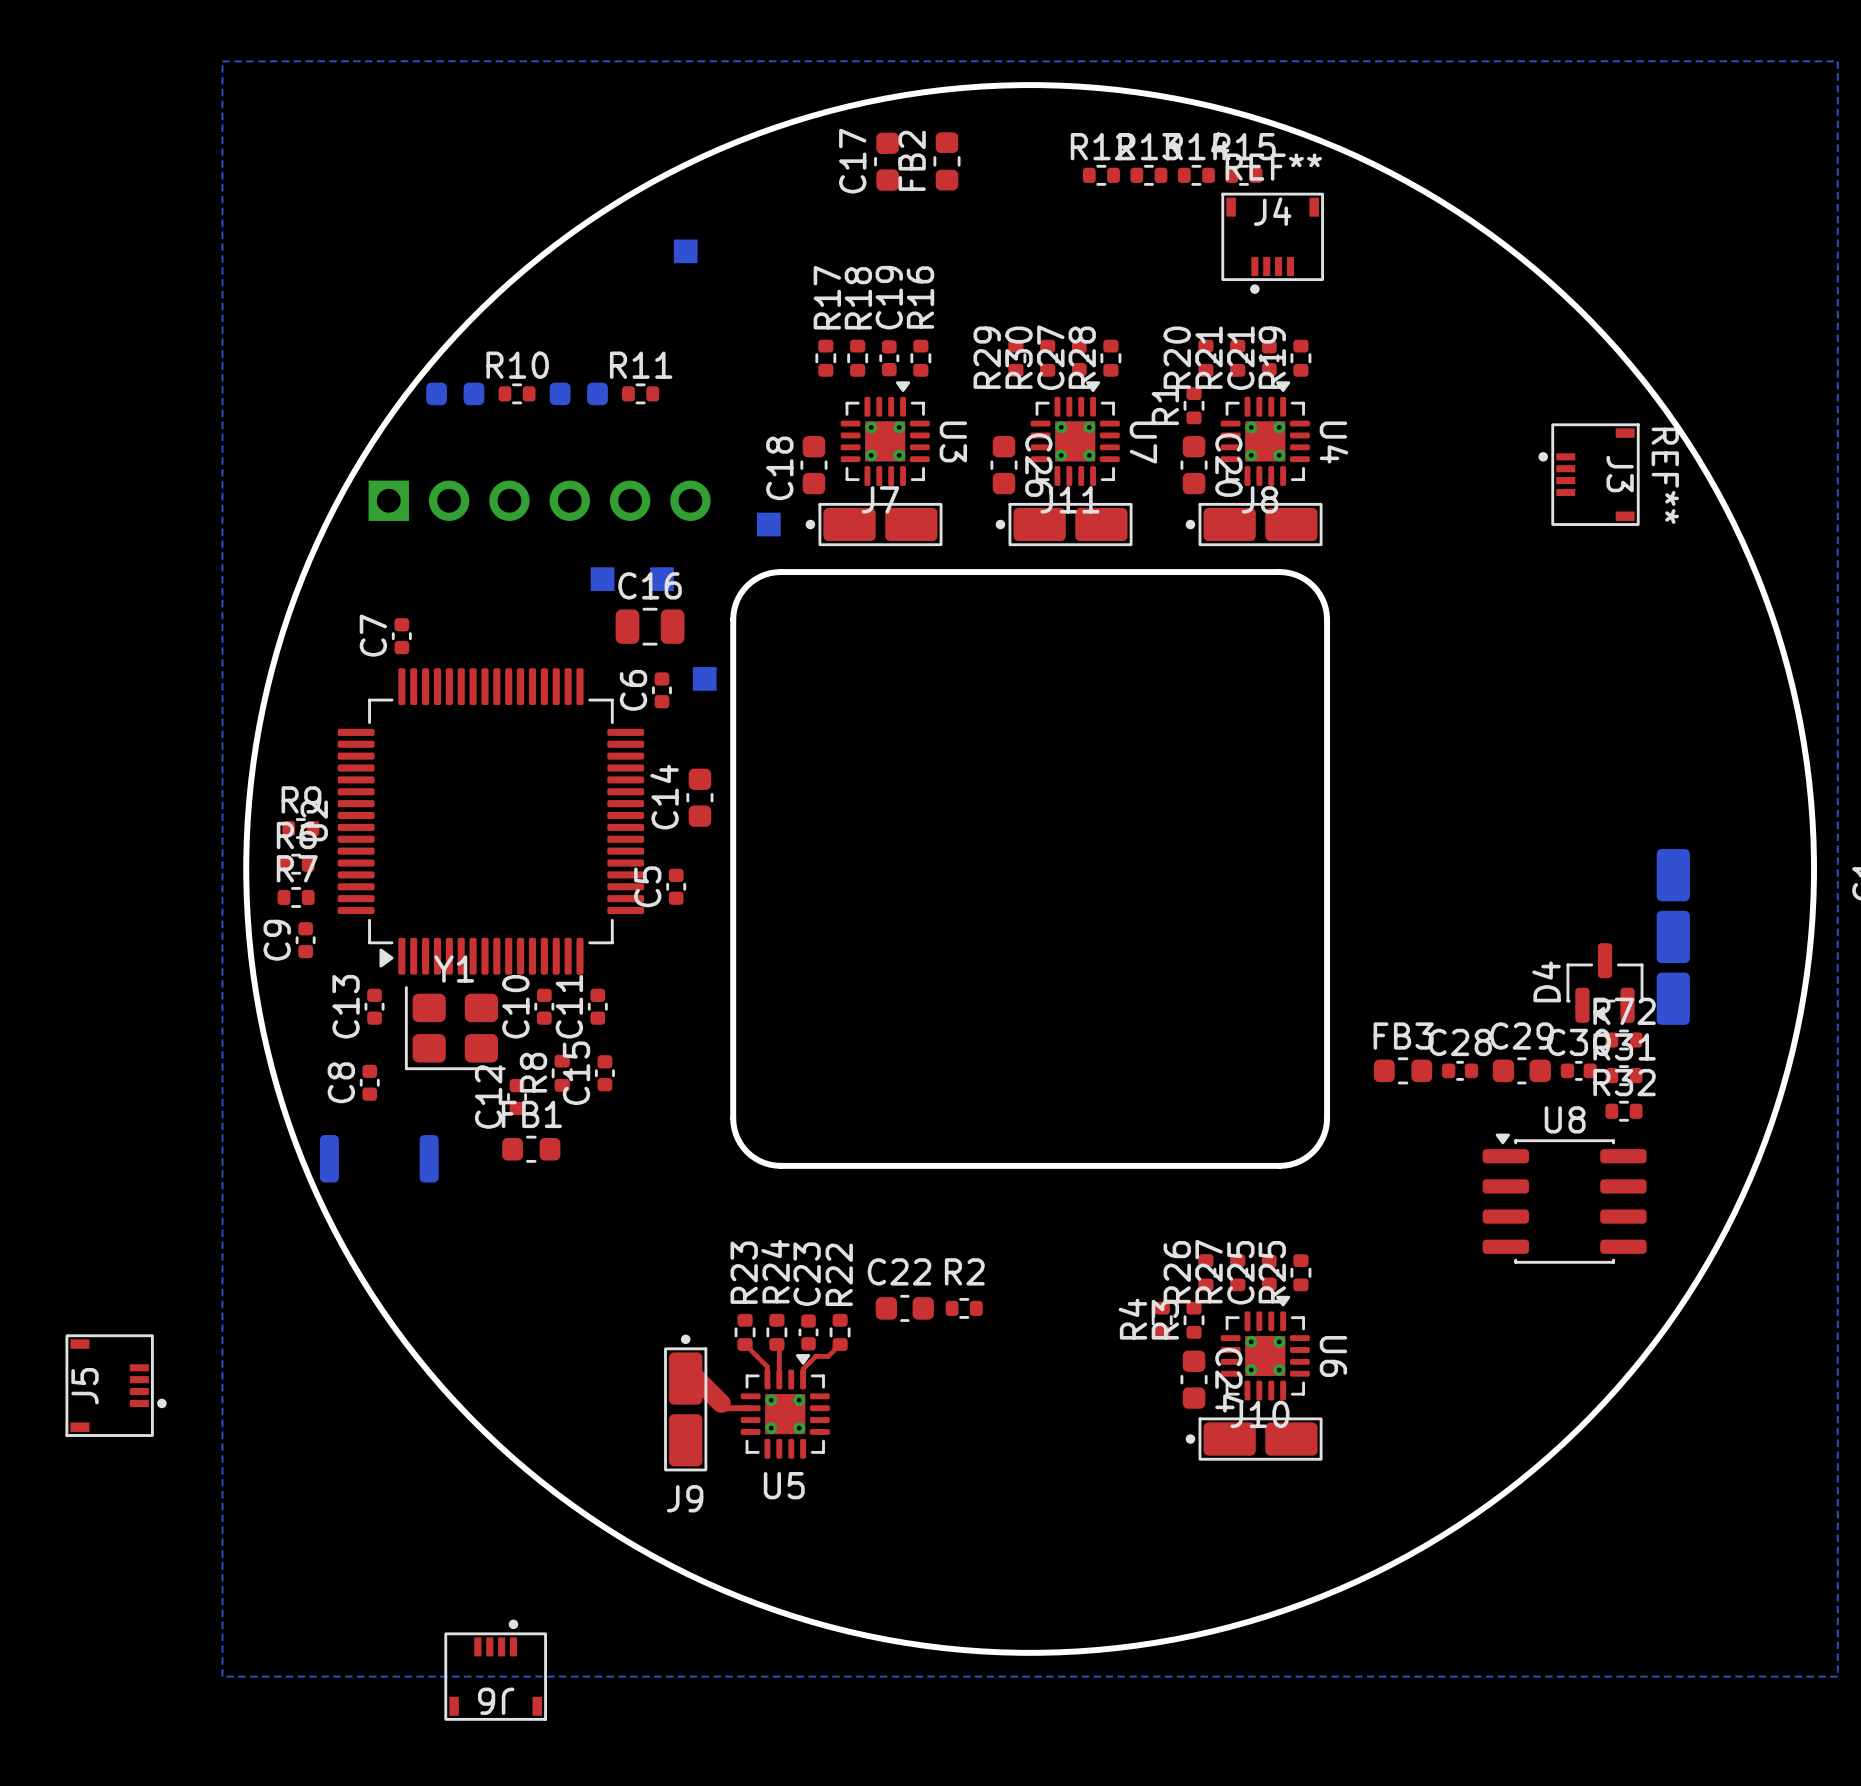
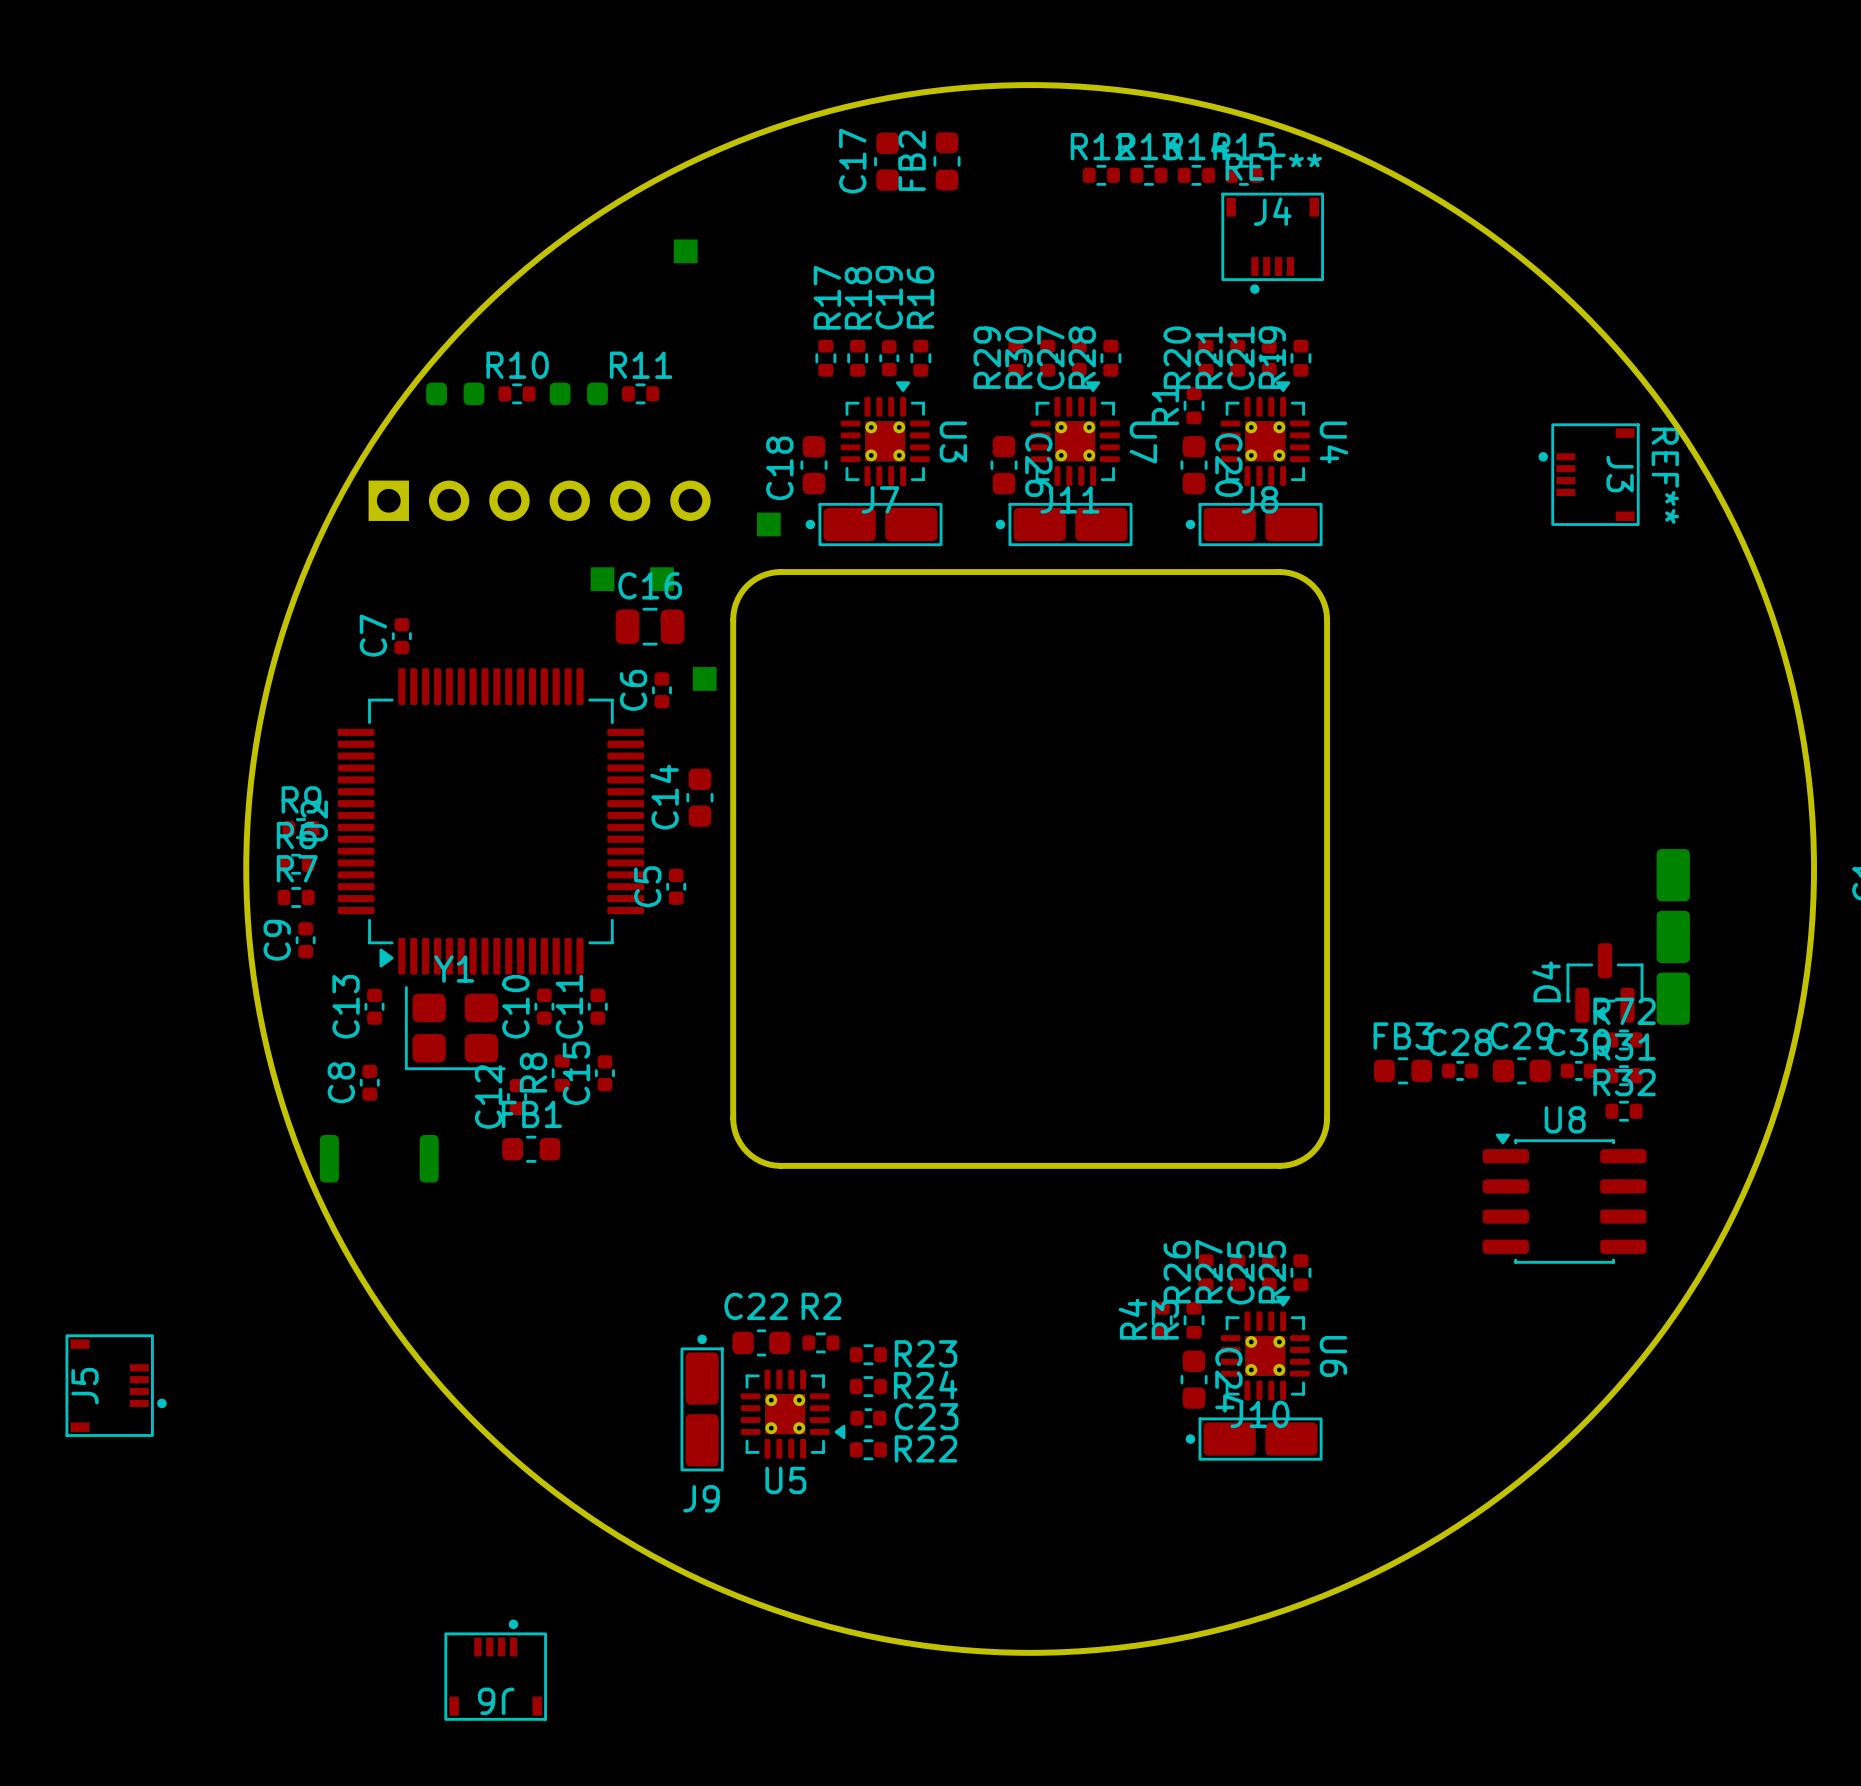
bottom zone outline: (222, 61) (1837, 61) (1837, 1676) (222, 1676) (222, 61) -> none
C22 position: (904, 1308) -> (761, 1342)
R2 position: (964, 1308) -> (820, 1342)
R23 rotation: 0° (745, 1332) -> 90° clockwise (868, 1354)
R23 position: (745, 1332) -> (868, 1354)
R24 rotation: 0° (776, 1332) -> 90° clockwise (868, 1386)
R24 position: (776, 1332) -> (868, 1386)
C23 rotation: 0° (808, 1332) -> 90° clockwise (868, 1418)
C23 position: (808, 1332) -> (868, 1418)
R22 rotation: 0° (840, 1332) -> 90° clockwise (868, 1449)
R22 position: (840, 1332) -> (868, 1449)
top track: (745, 1344) (767, 1366) (767, 1379) -> none
top track: (776, 1344) (779, 1346) (779, 1379) -> none
top track: (840, 1344) (828, 1356) (815, 1356) (803, 1369) (803, 1379) -> none
top track: (685, 1378) (696, 1378) (726, 1408) (750, 1408) -> none
J9 position: (685, 1402) -> (702, 1402)
U5 rotation: 0° (785, 1406) -> 90° clockwise (793, 1414)

